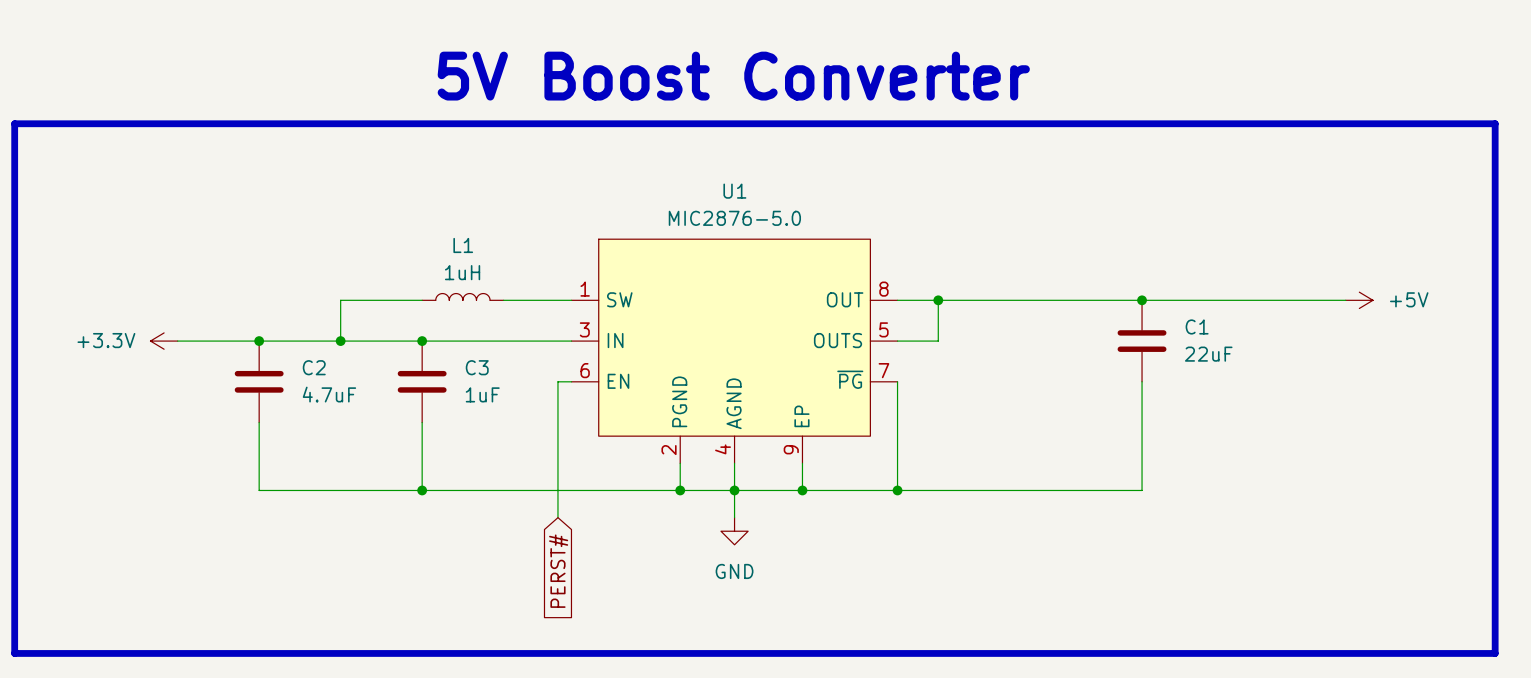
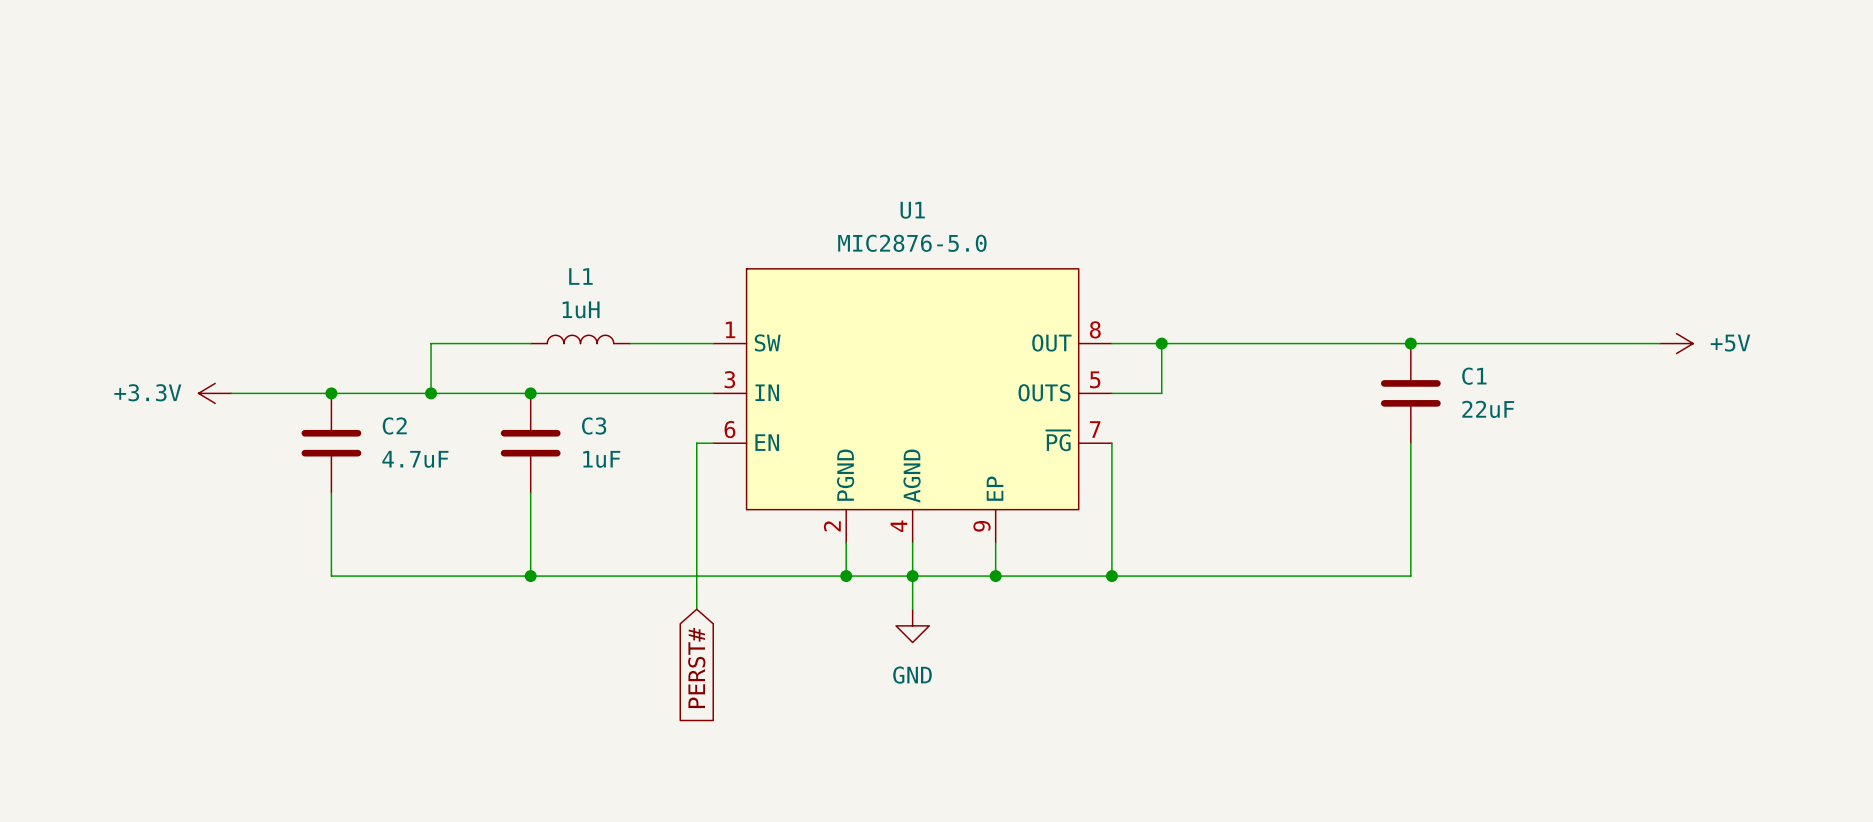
text: 5V Boost Converter (733, 76) -> none
line: (14, 123) (1495, 123) (1495, 653) (14, 653) (14, 123) -> none

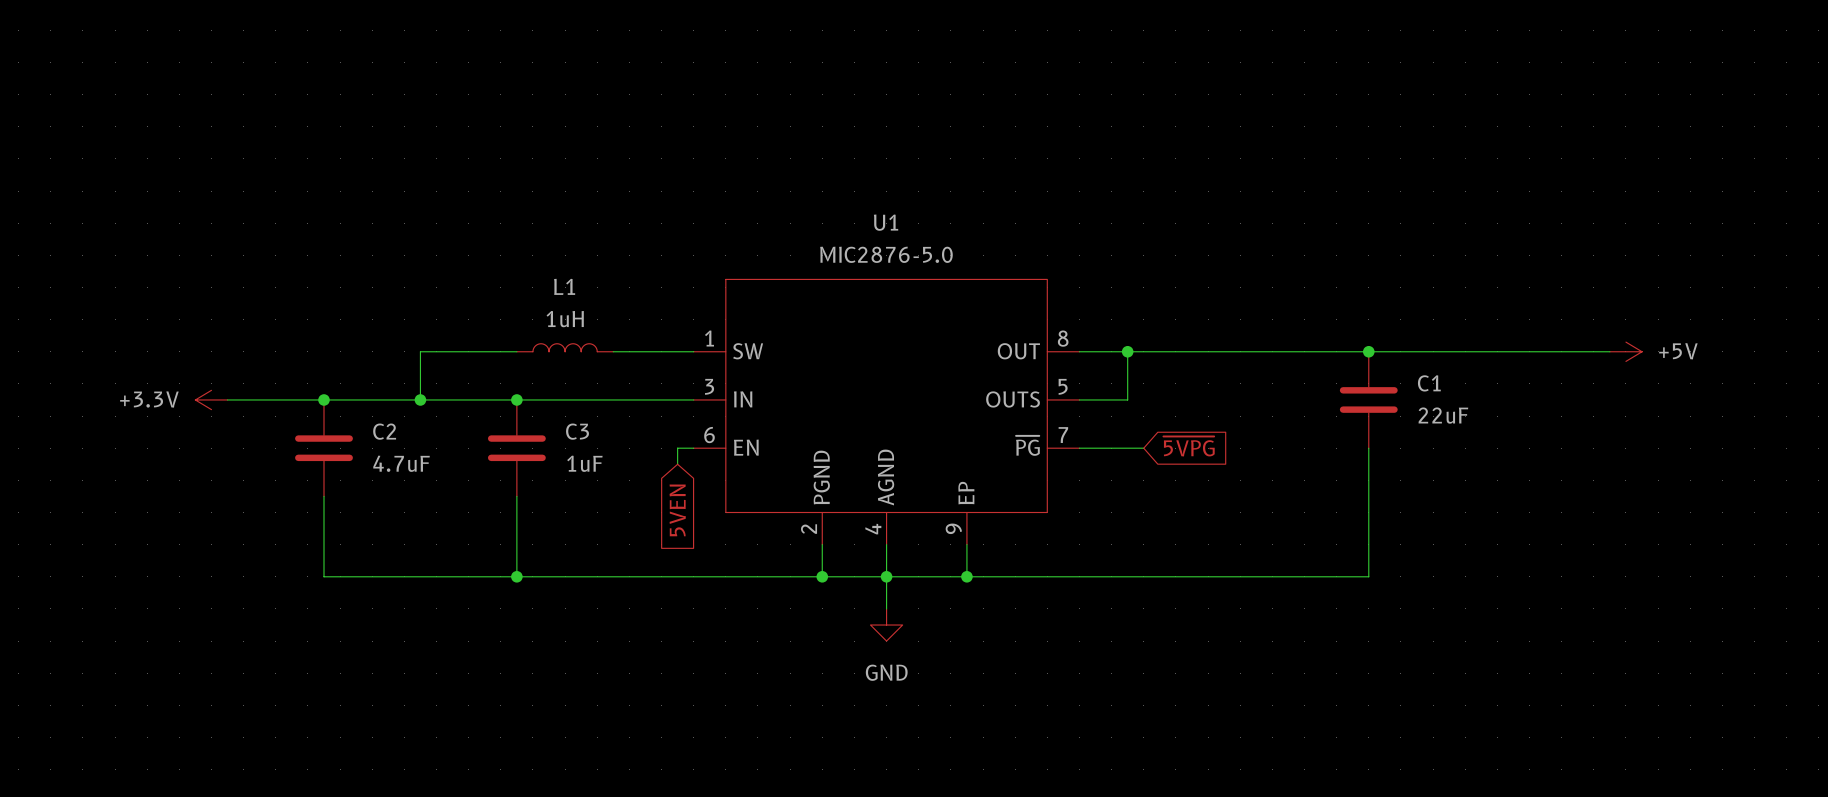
global label: none -> ~{5VPG} (1189, 446)
wire: (1111, 443) (1111, 576) -> (1079, 448) (1143, 448)
wire: (696, 459) (696, 609) -> none
global label: none -> 5VEN (677, 510)
junction: (1111, 576) -> none
global label: PERST# (696, 668) -> none

